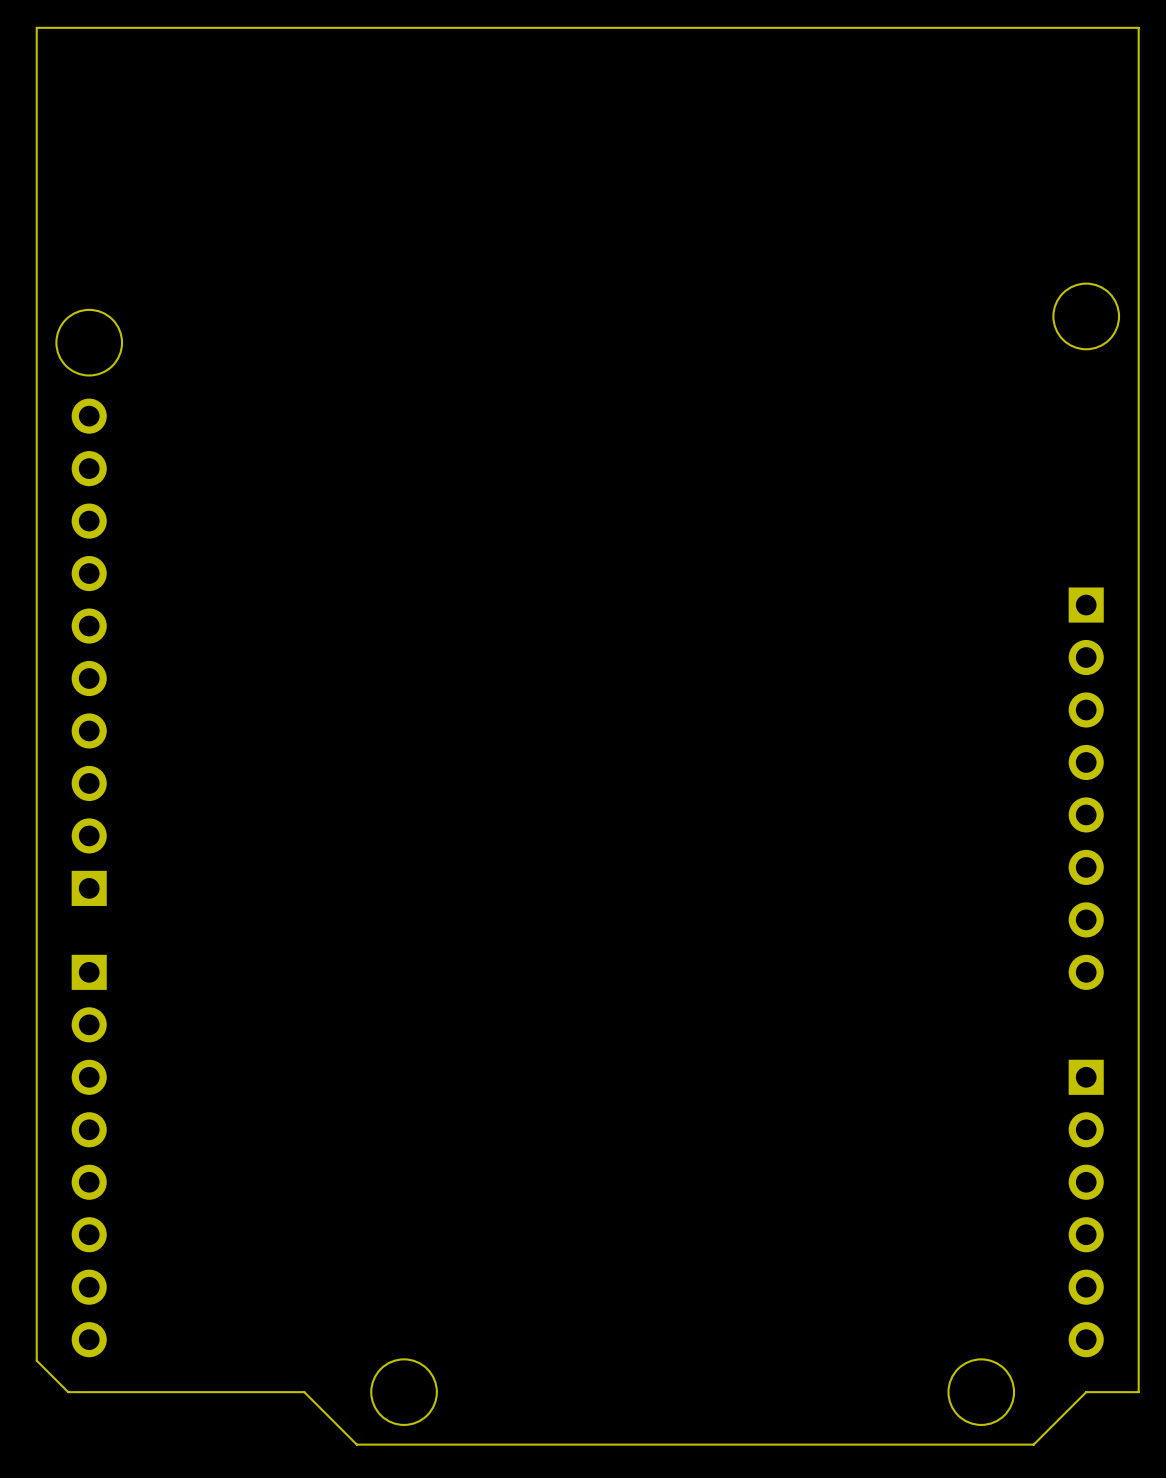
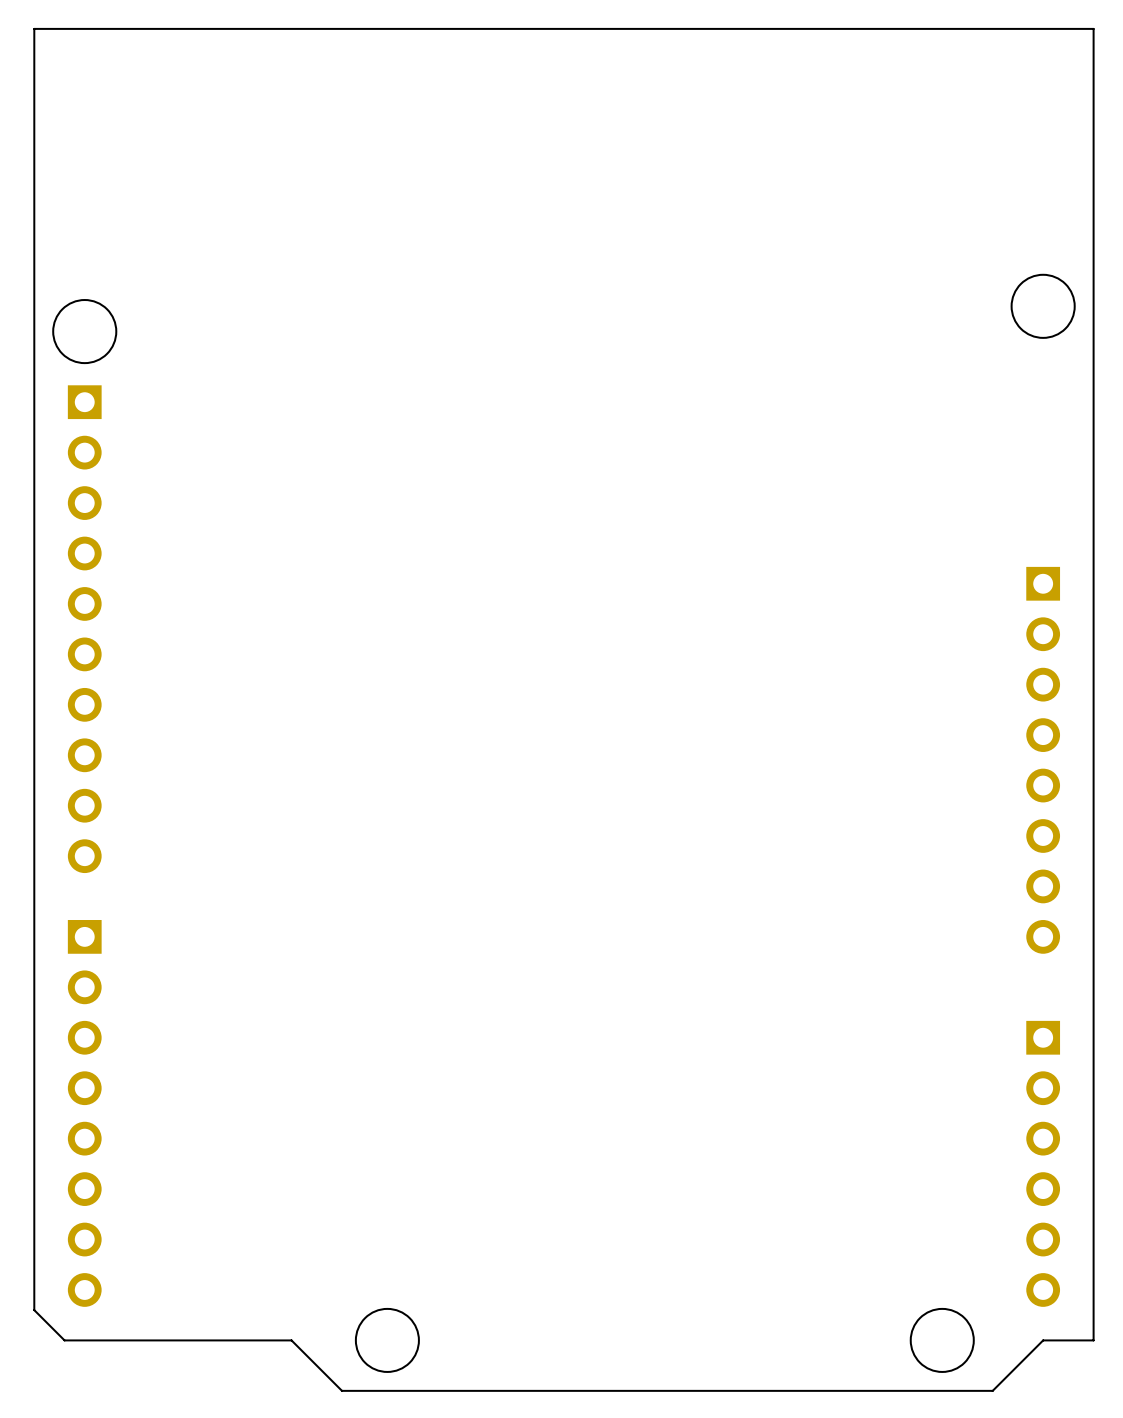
part rotation: 0° (89, 652) -> 180° (84, 629)

